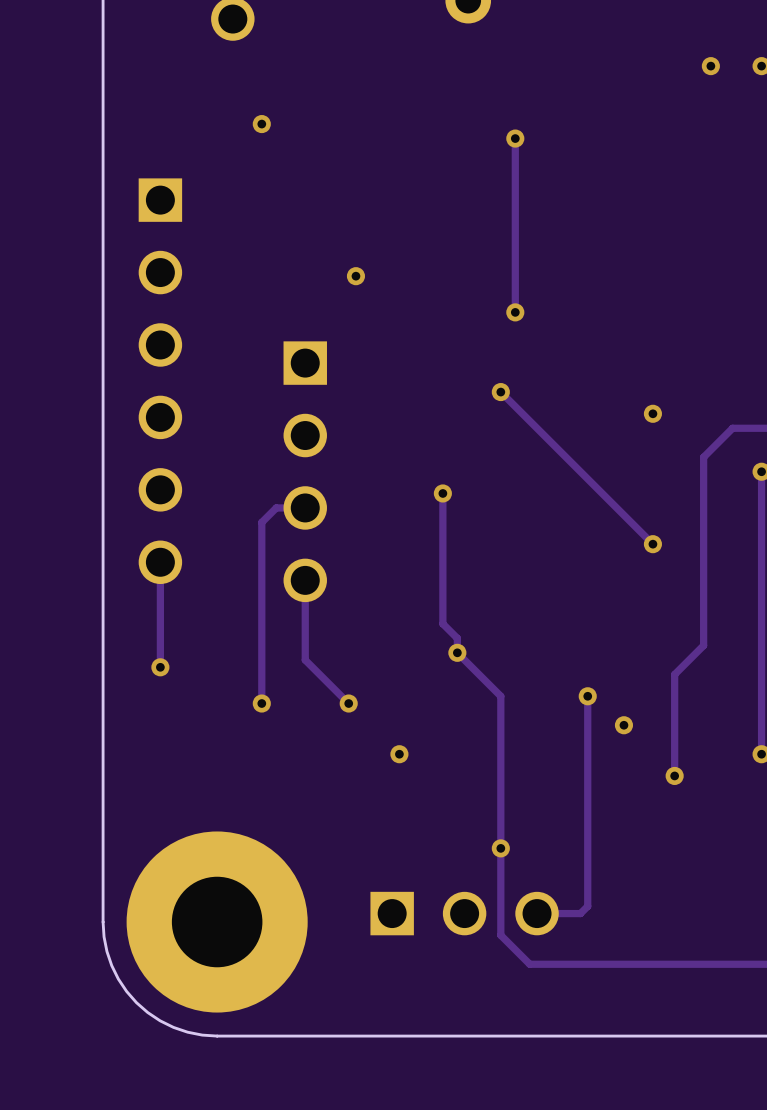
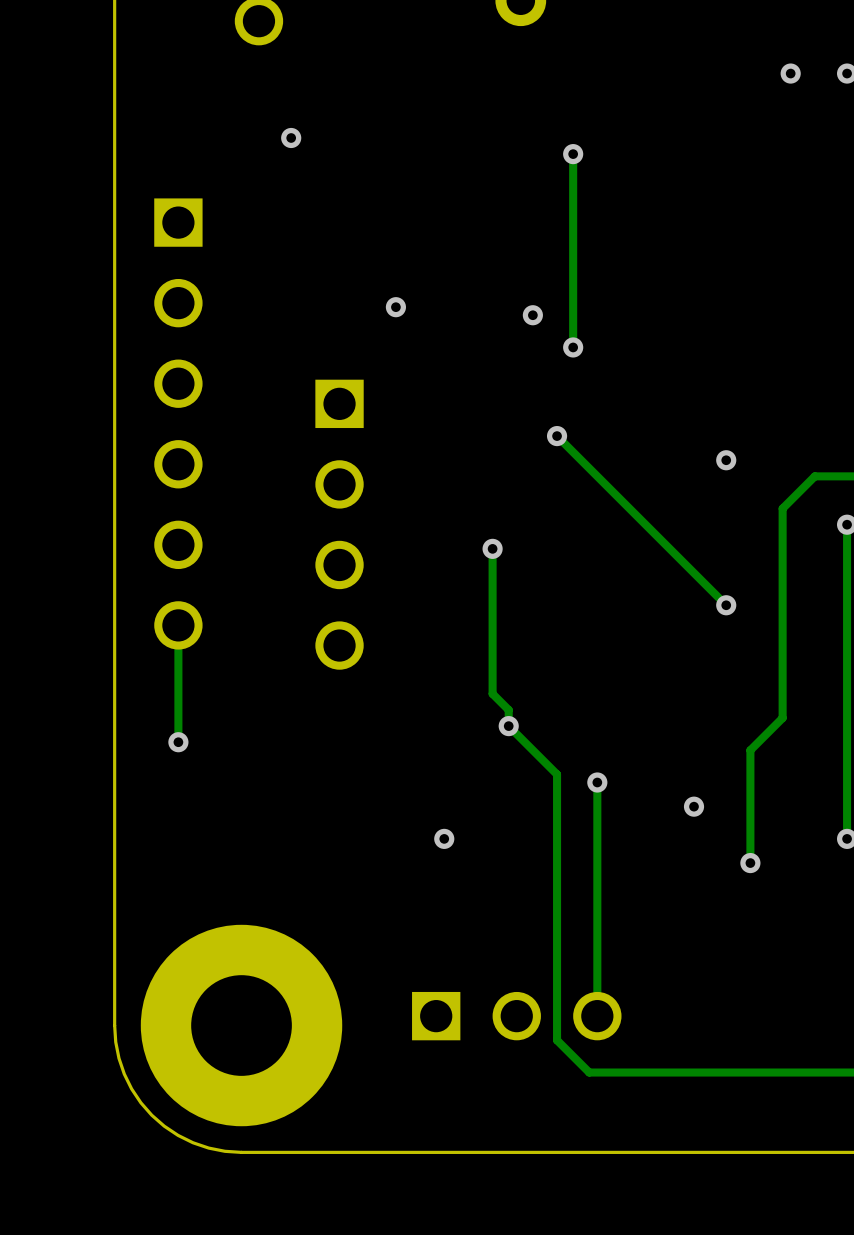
via: none -> (532, 315)
track: (305, 507) (276, 507) (261, 522) (261, 703) -> none
track: (305, 580) (305, 660) (348, 703) -> none
track: (587, 696) (587, 906) (580, 913) (537, 913) -> (597, 782) (597, 1016)
via position: (587, 696) -> (597, 782)
via: (261, 703) -> none
via: (348, 703) -> none
via: (500, 848) -> none

